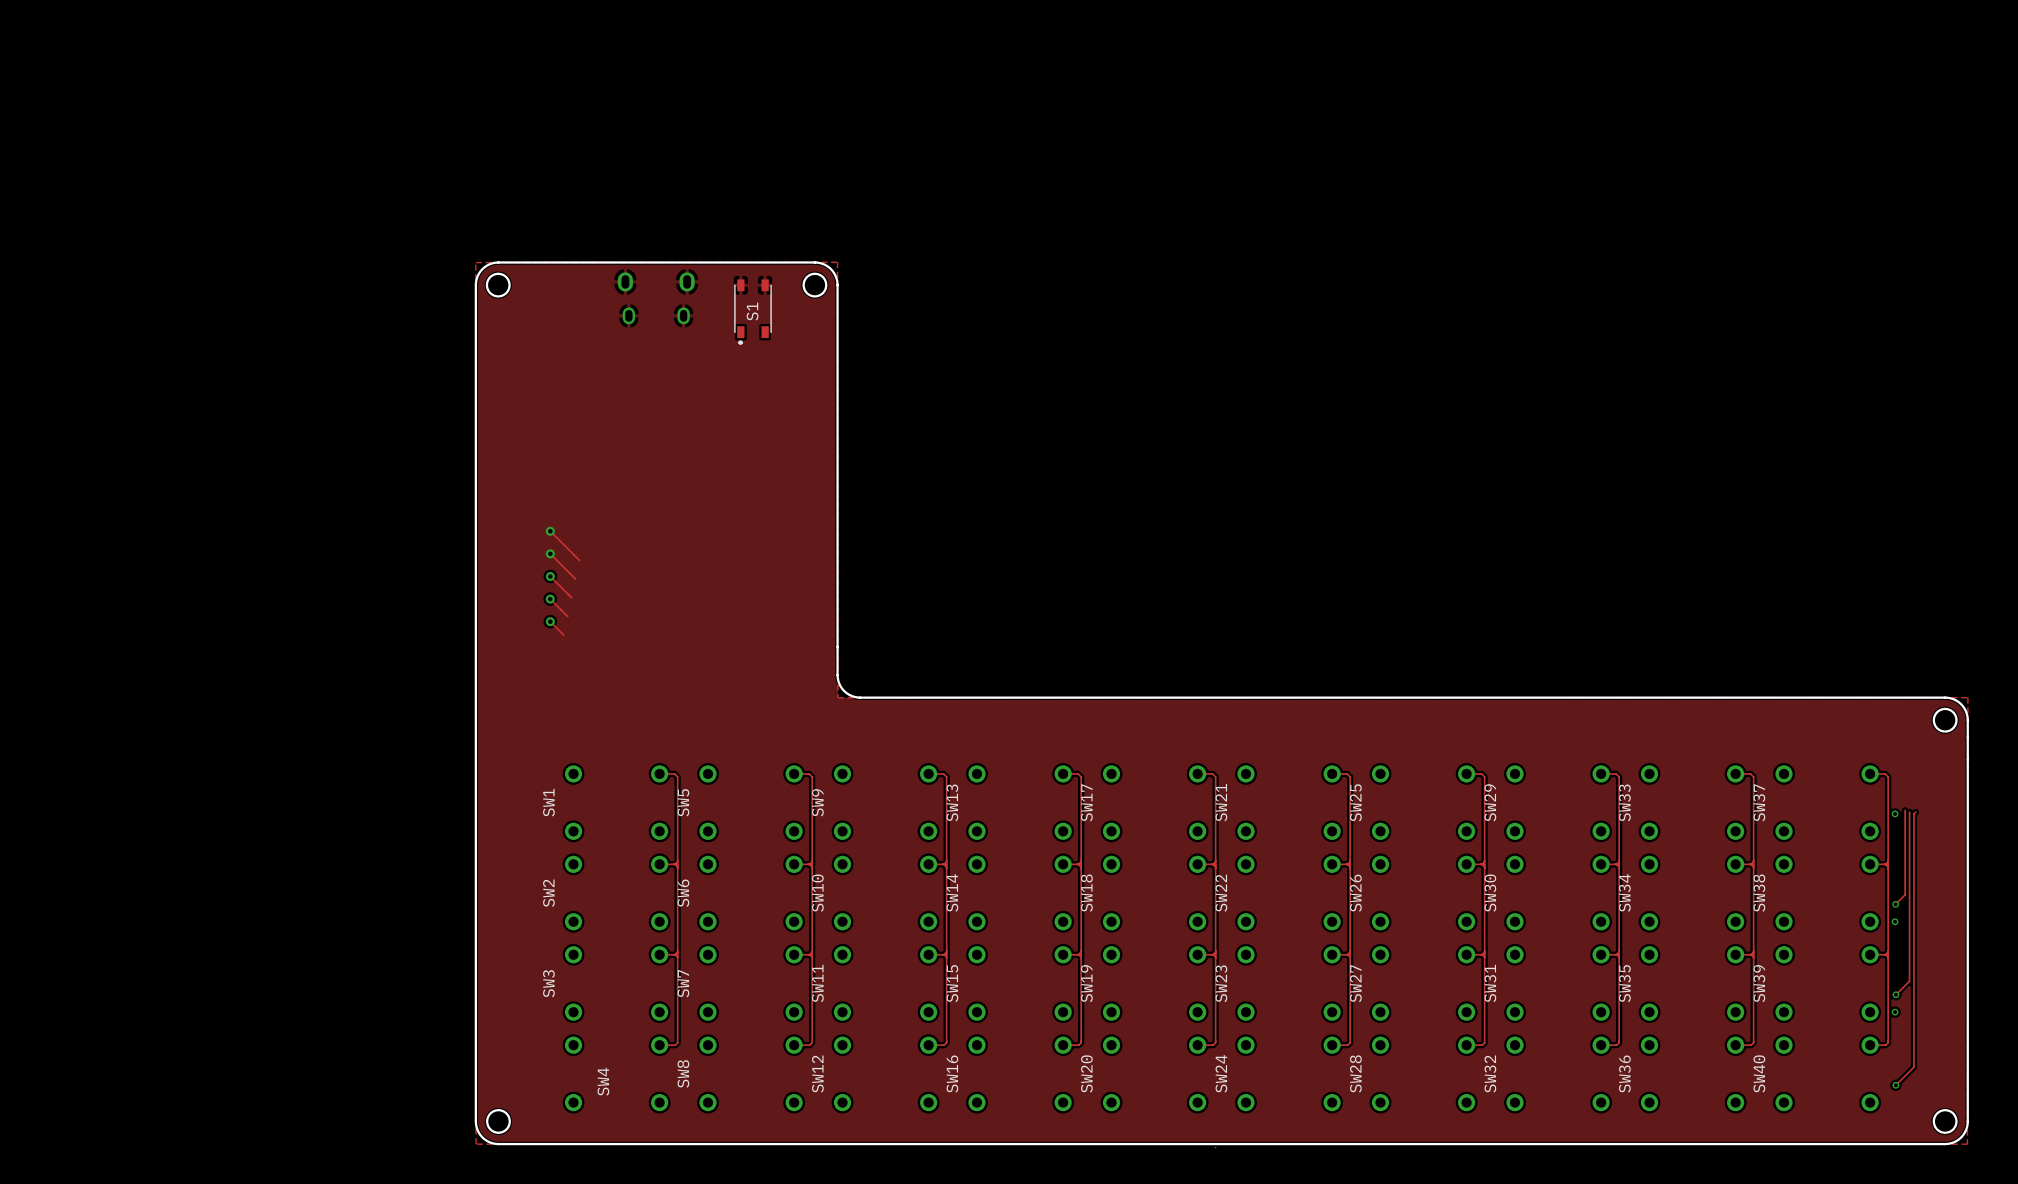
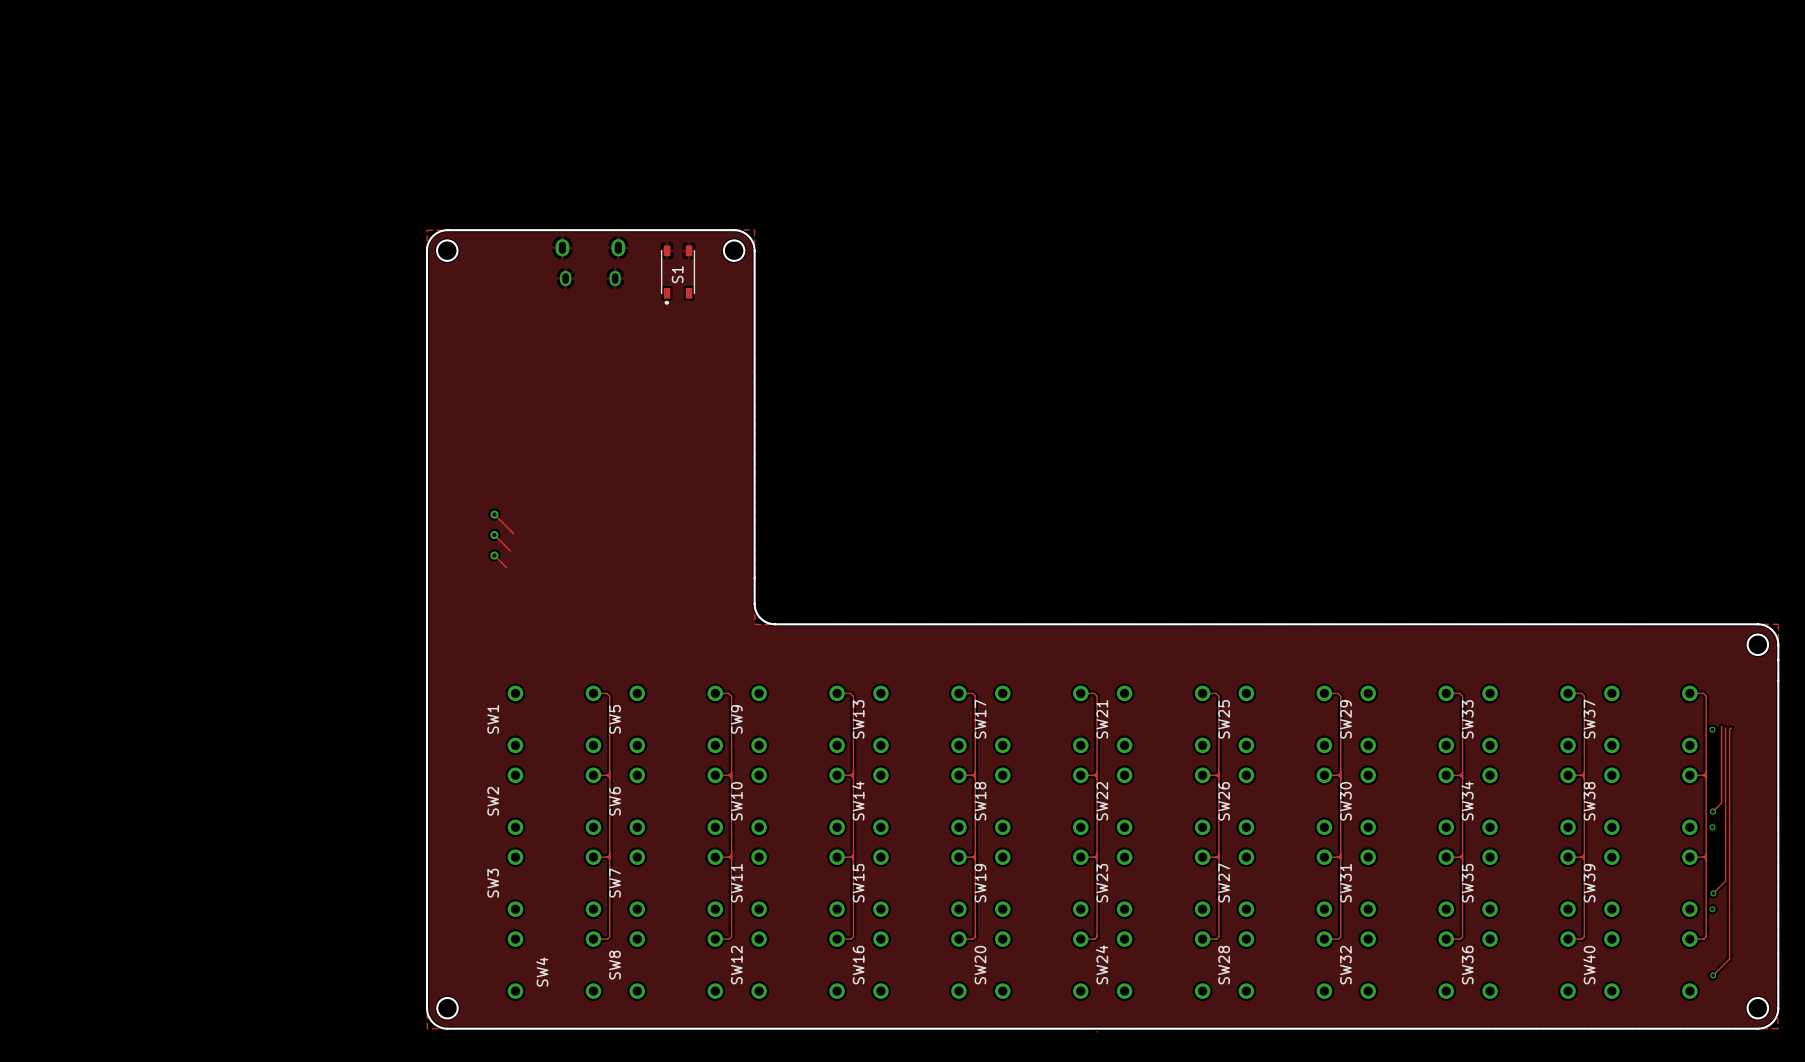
track: (550, 531) (579, 560) -> none
via: (550, 531) -> none
track: (550, 553) (575, 579) -> none
via: (550, 553) -> none

